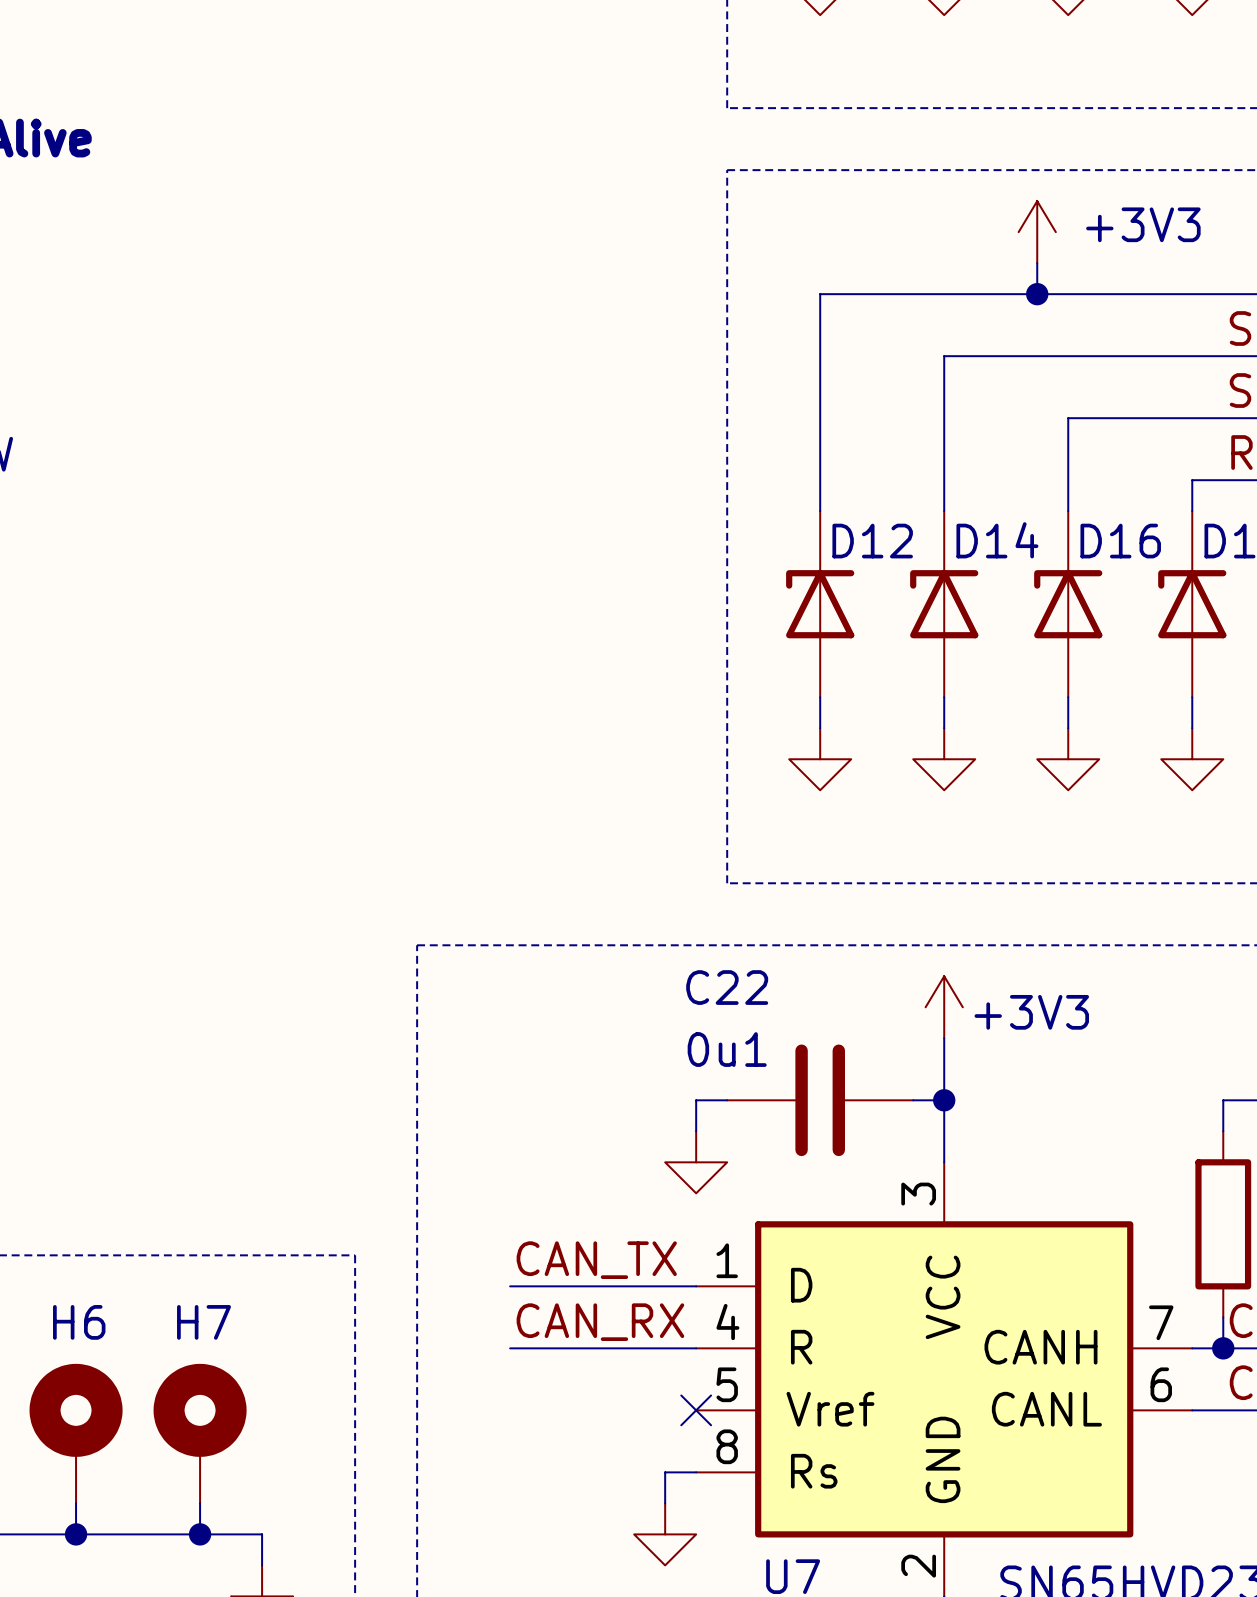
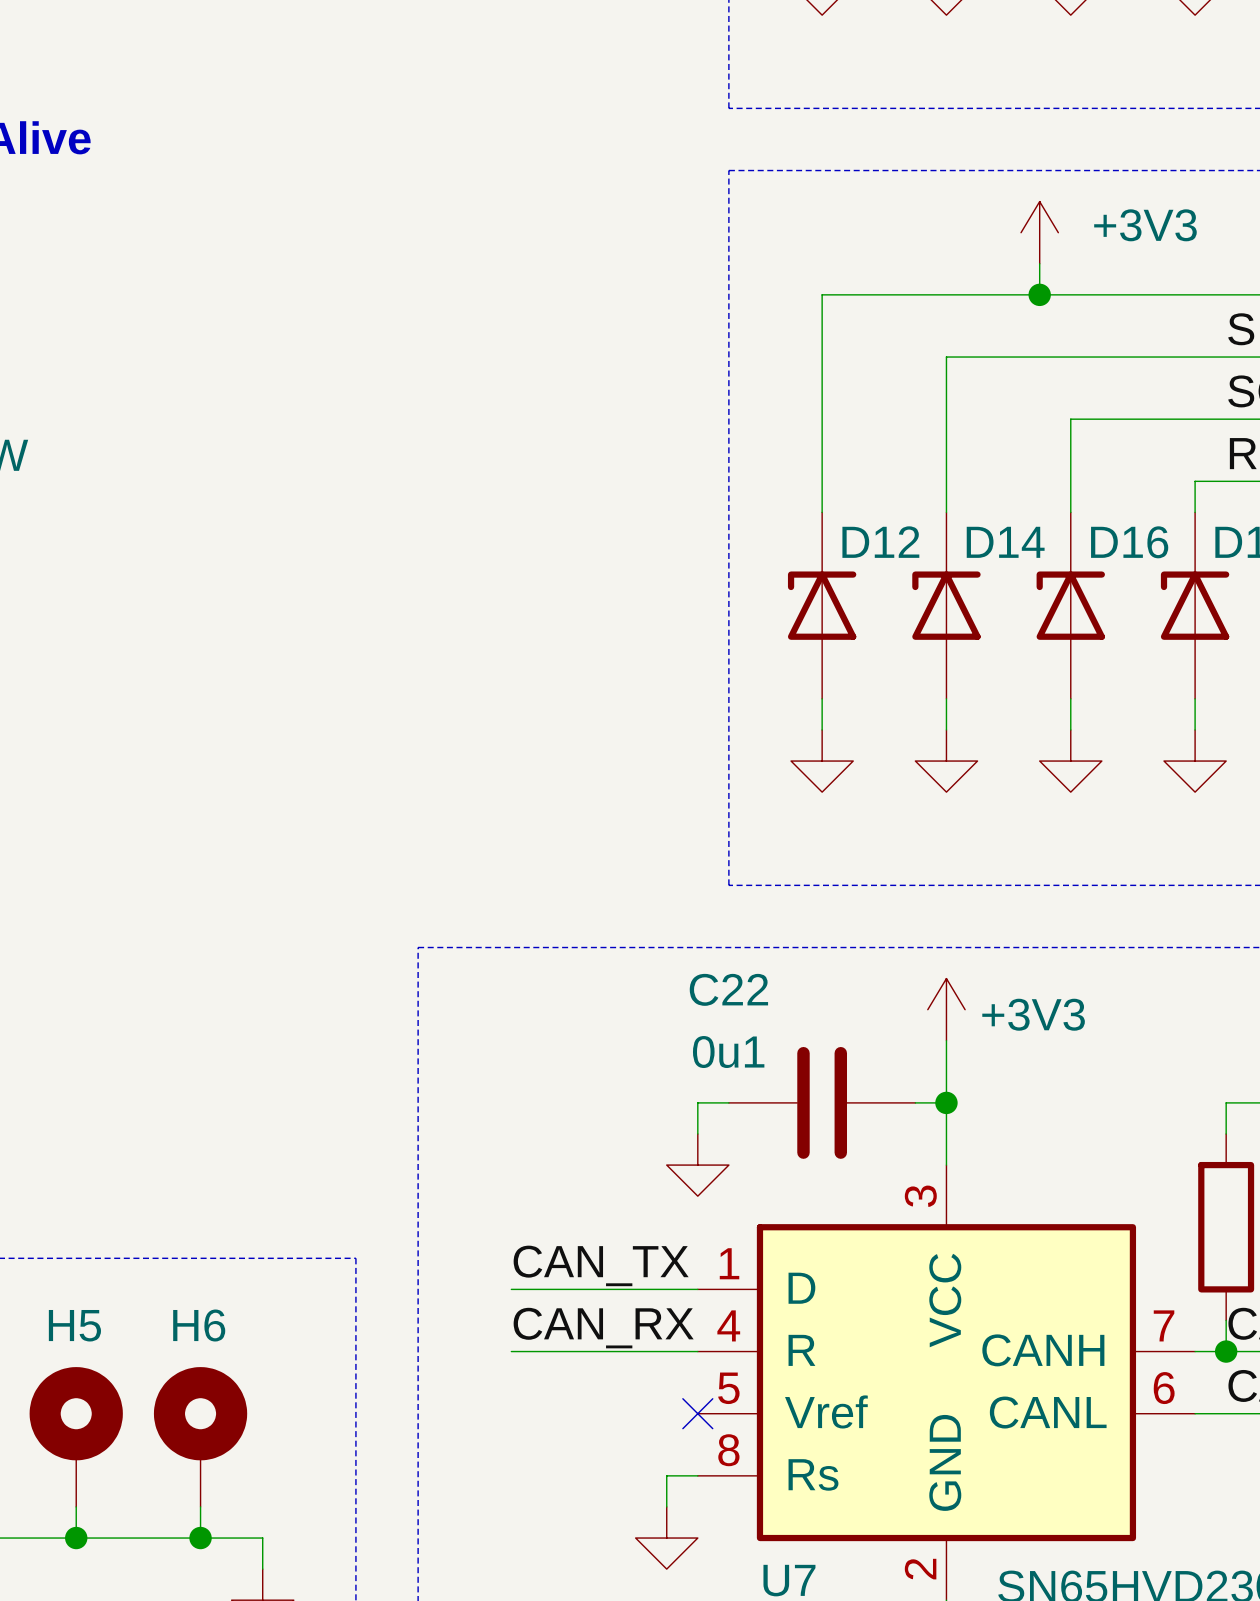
H6 name: H6 (79, 1322) -> H5 (74, 1325)
H7 name: H7 (204, 1322) -> H6 (199, 1325)

